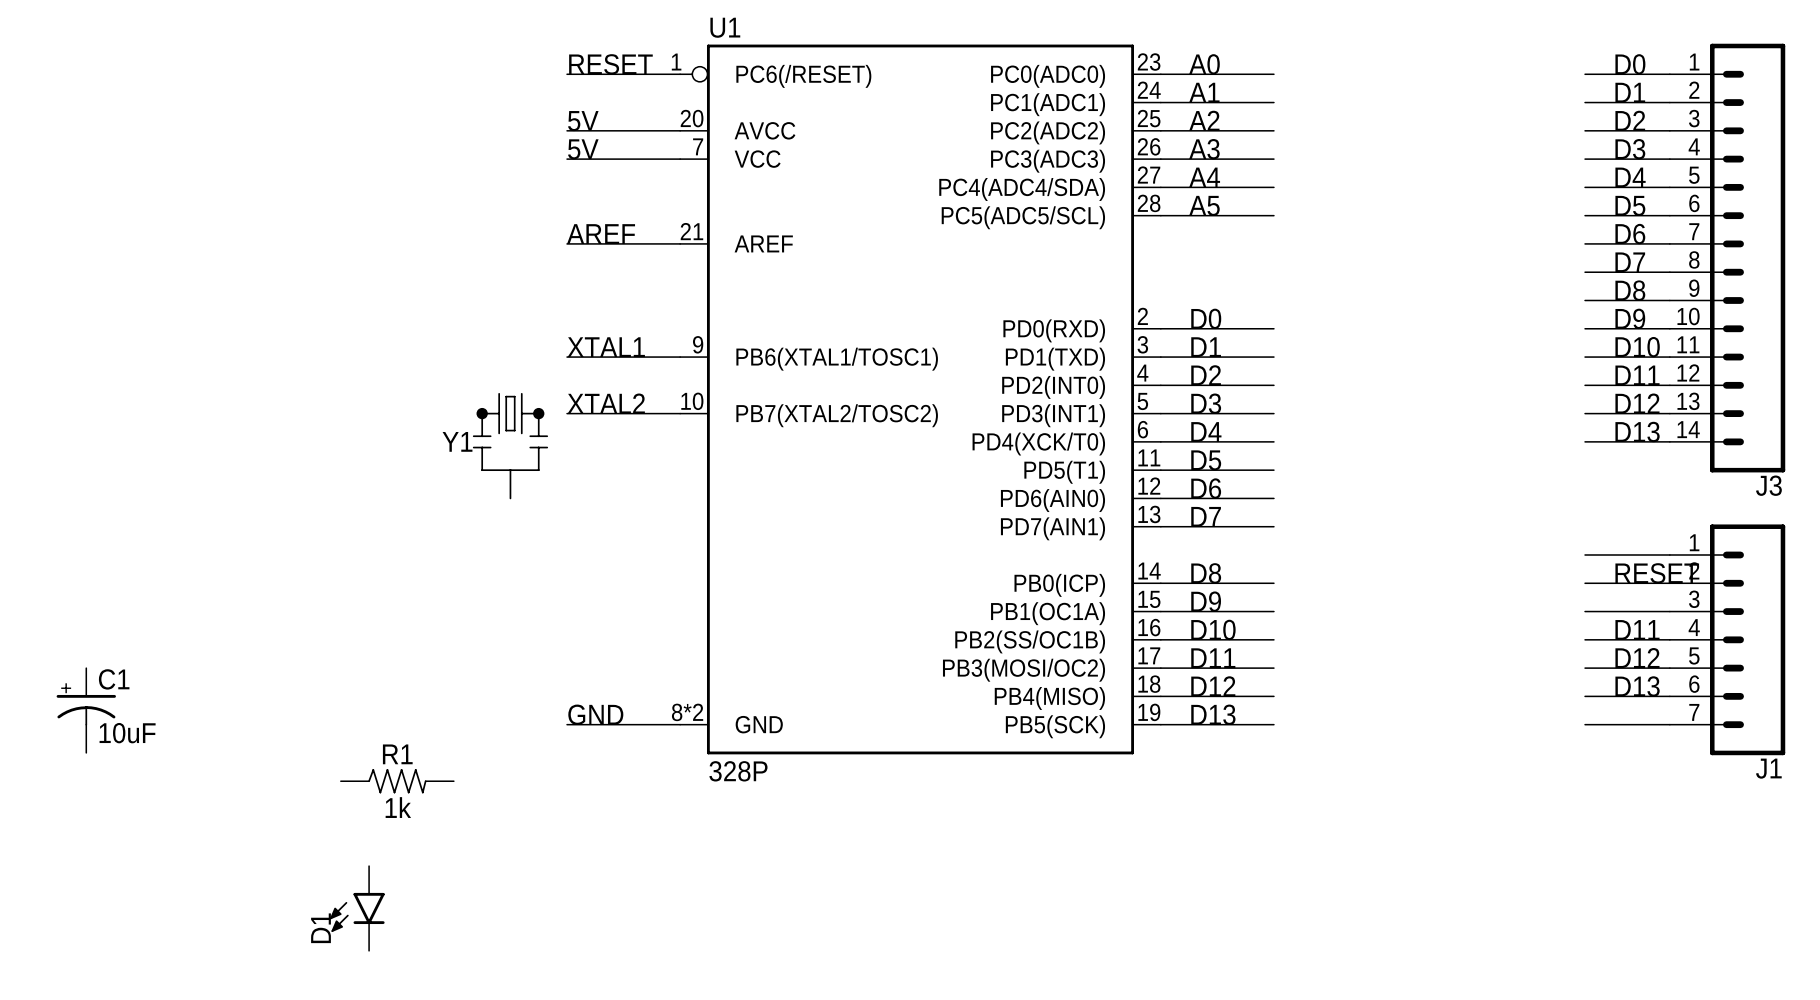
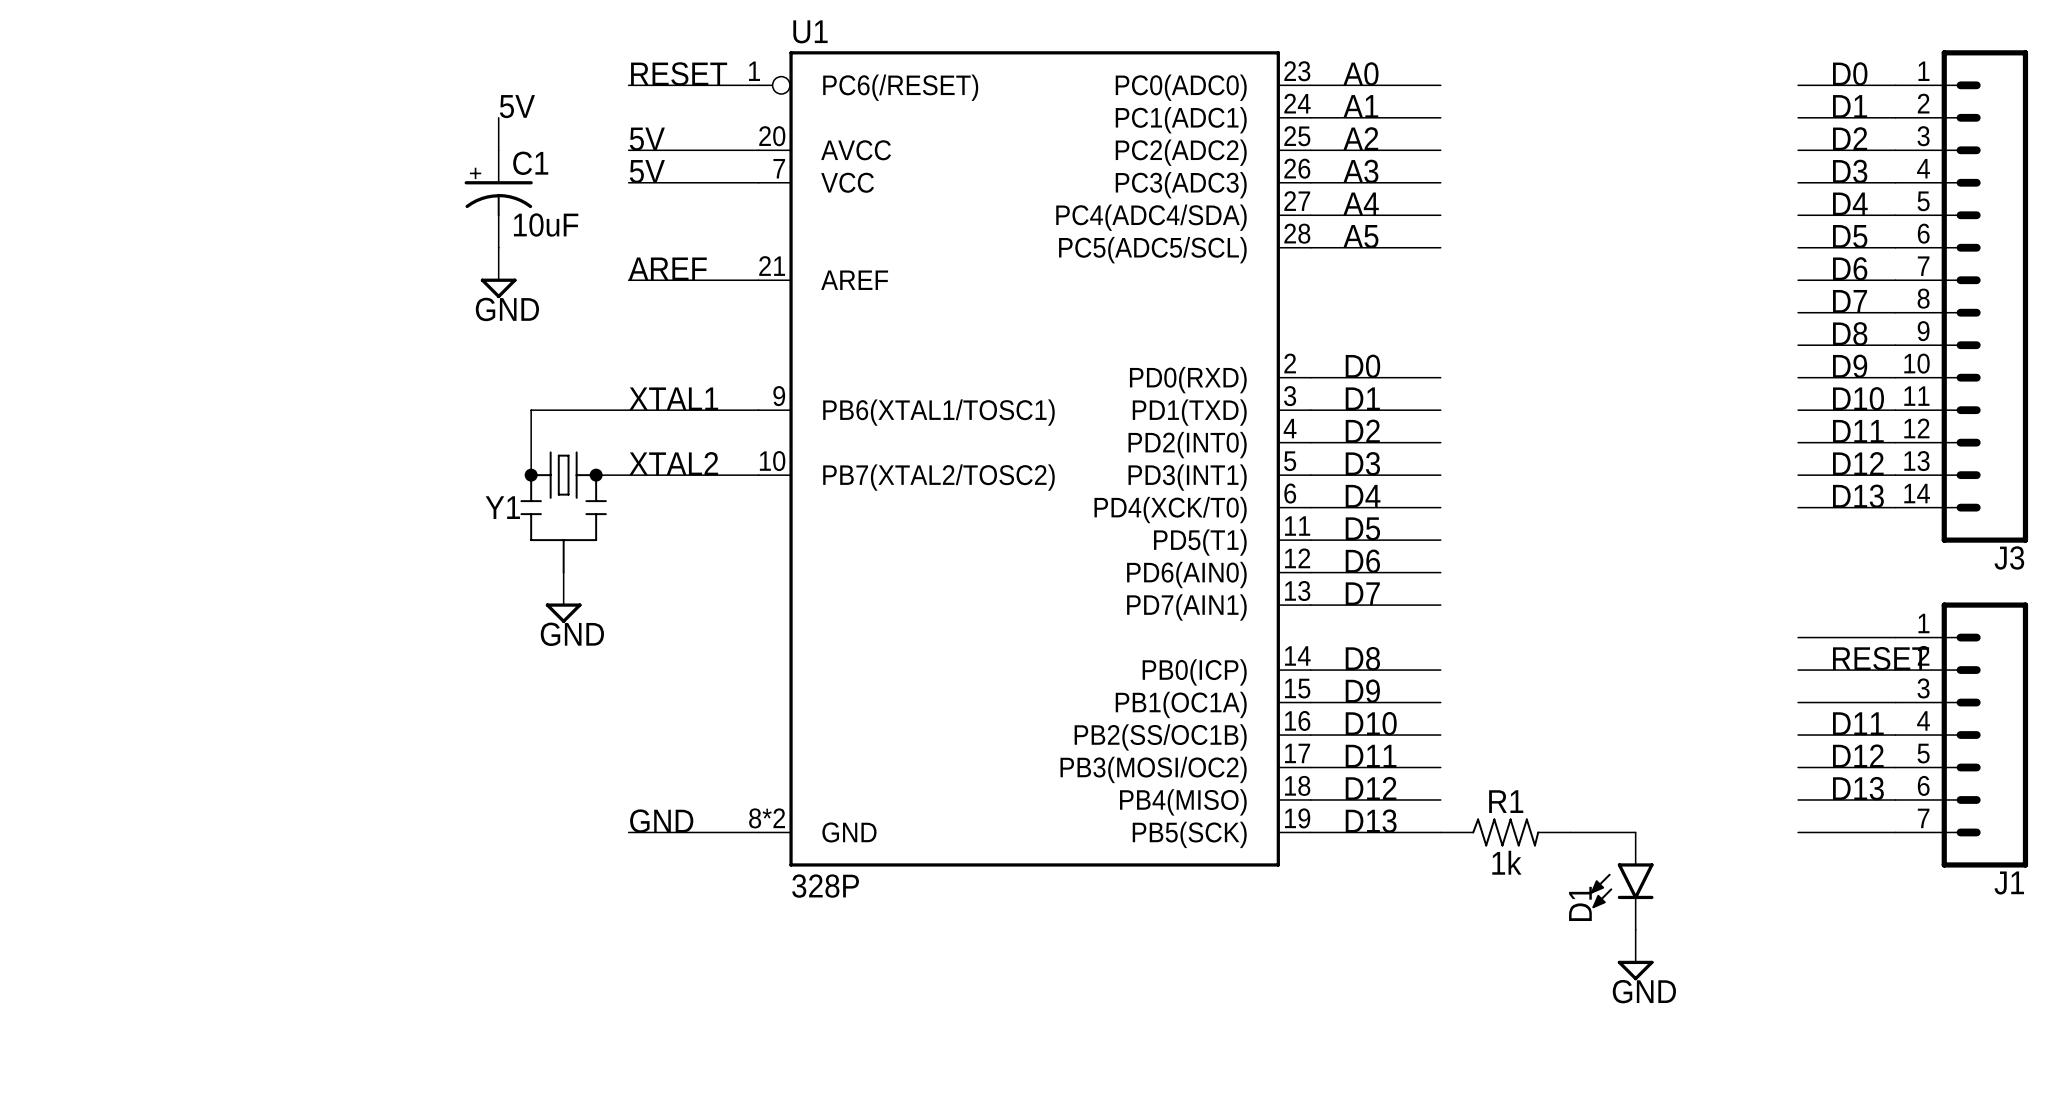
label: none -> 5V (517, 106)
wire: none -> (498, 117) (498, 150)
power symbol: none -> GND (498, 272)
wire: none -> (628, 410) (531, 410) (531, 475)
wire: none -> (596, 475) (628, 475)
power symbol: none -> GND (563, 597)
C1 position: (86, 710) -> (498, 199)
wire: none -> (1570, 832) (1635, 832)
R1 position: (397, 781) -> (1505, 832)
power symbol: none -> GND (1635, 955)
D1 position: (357, 908) -> (1622, 881)

